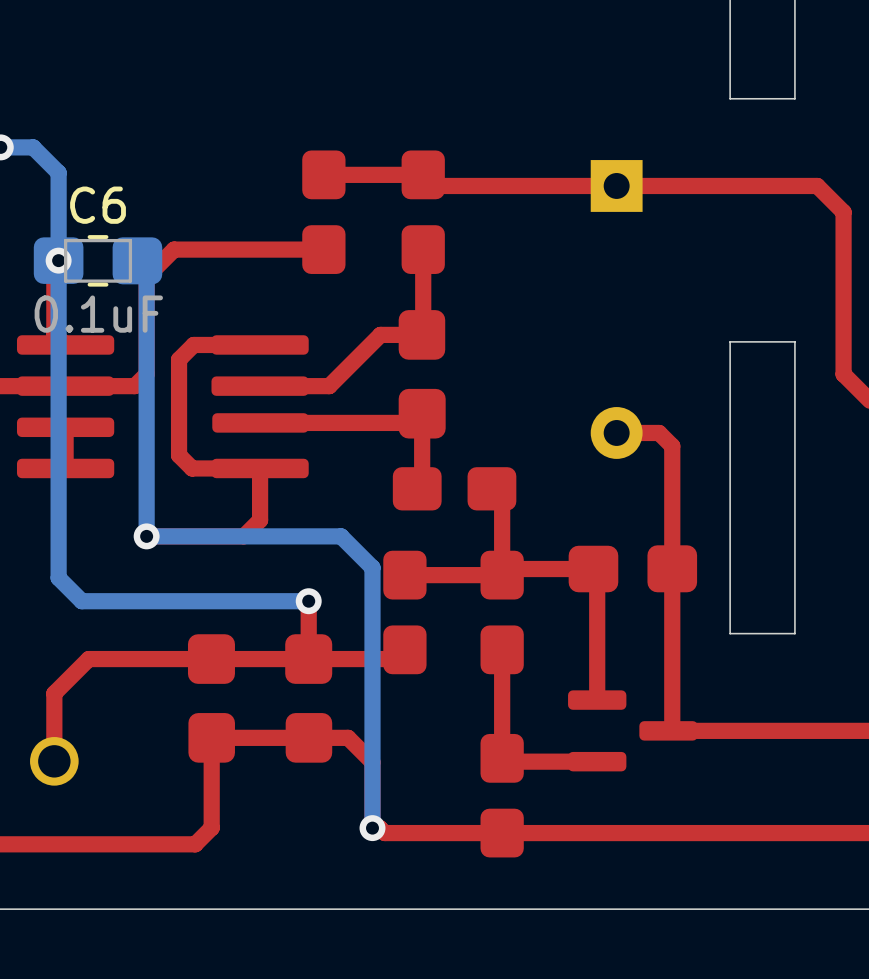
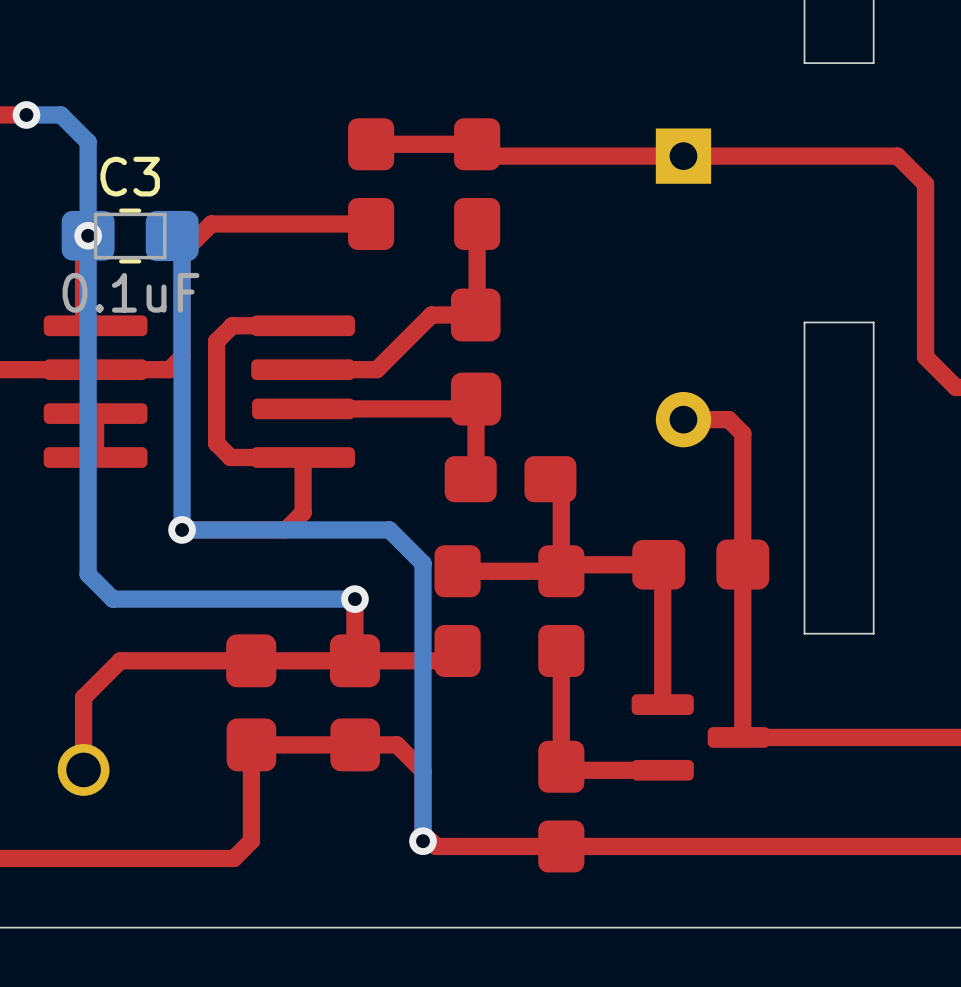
C6 name: C6 (98, 205) -> C3 (130, 176)

